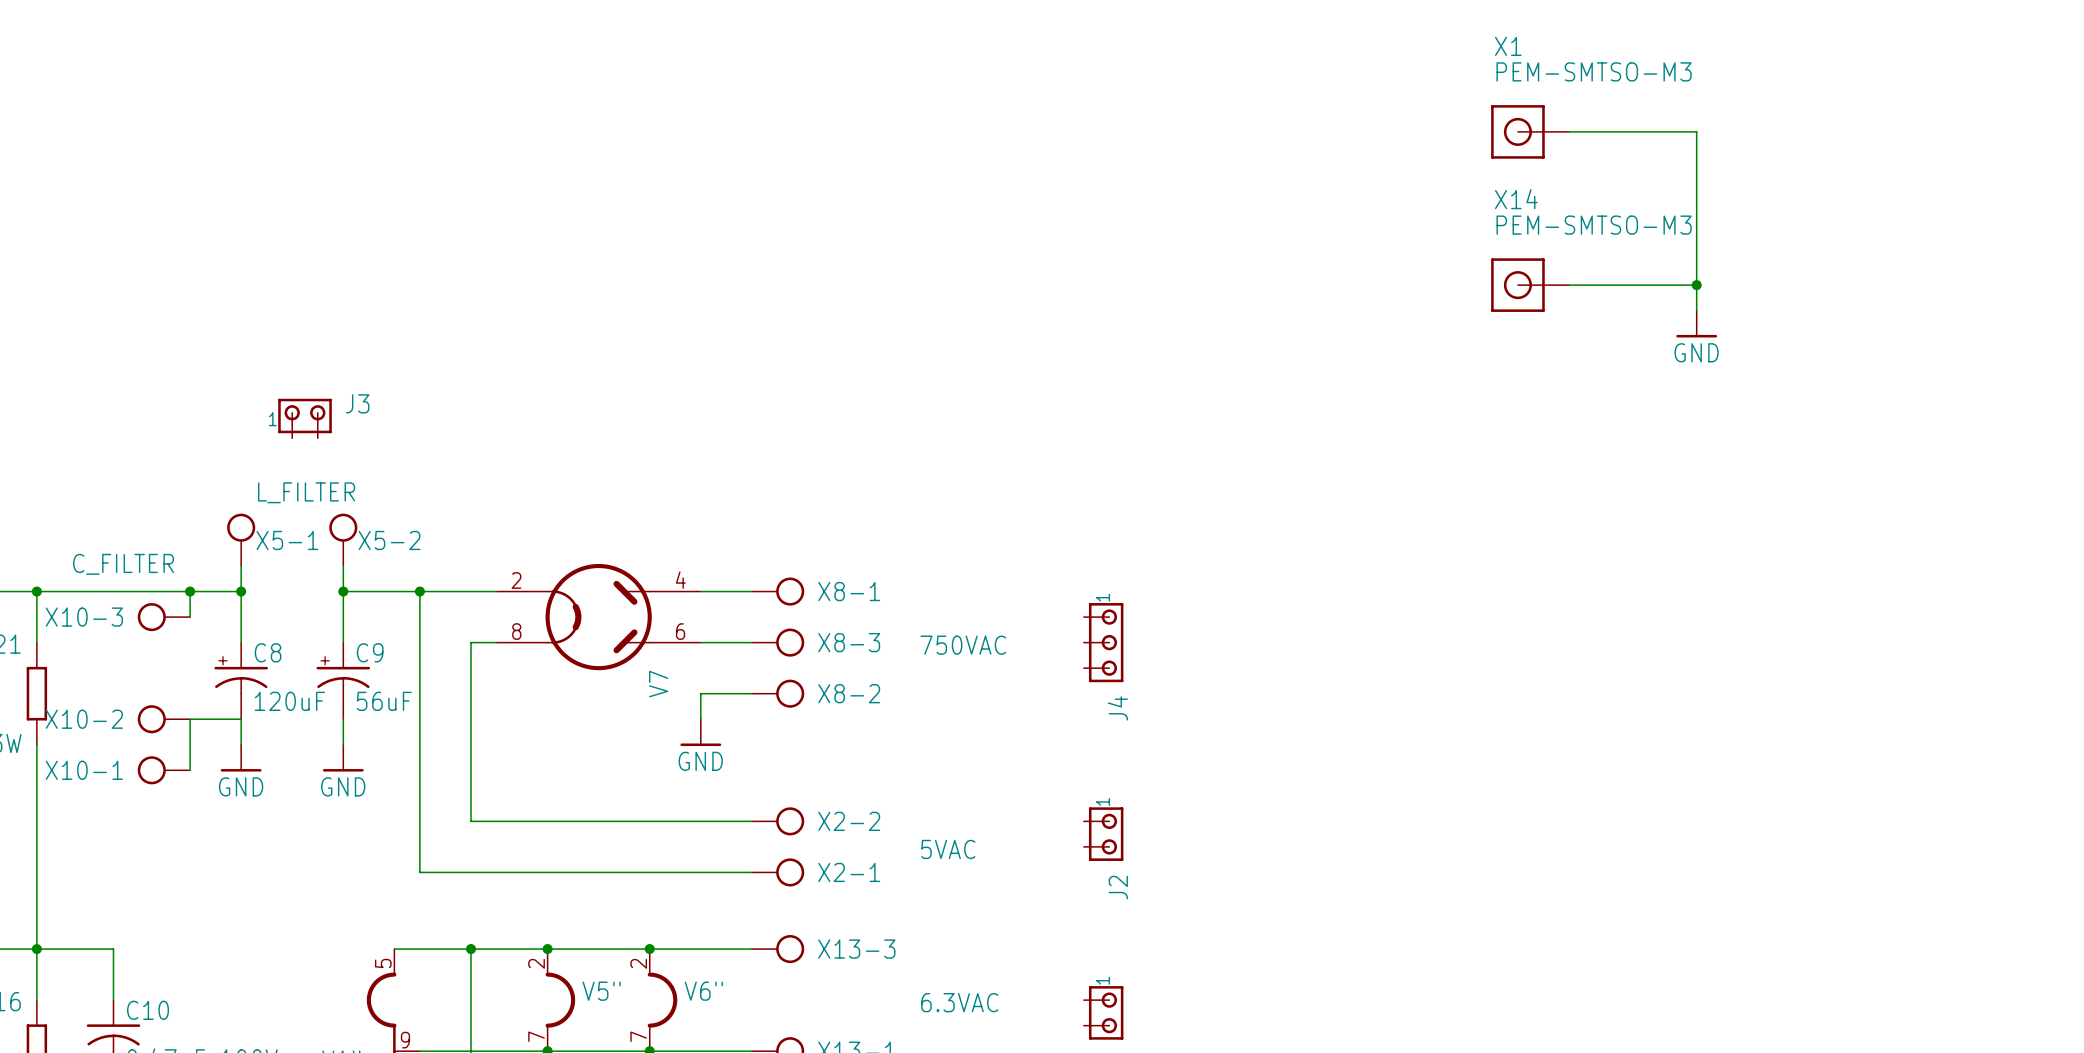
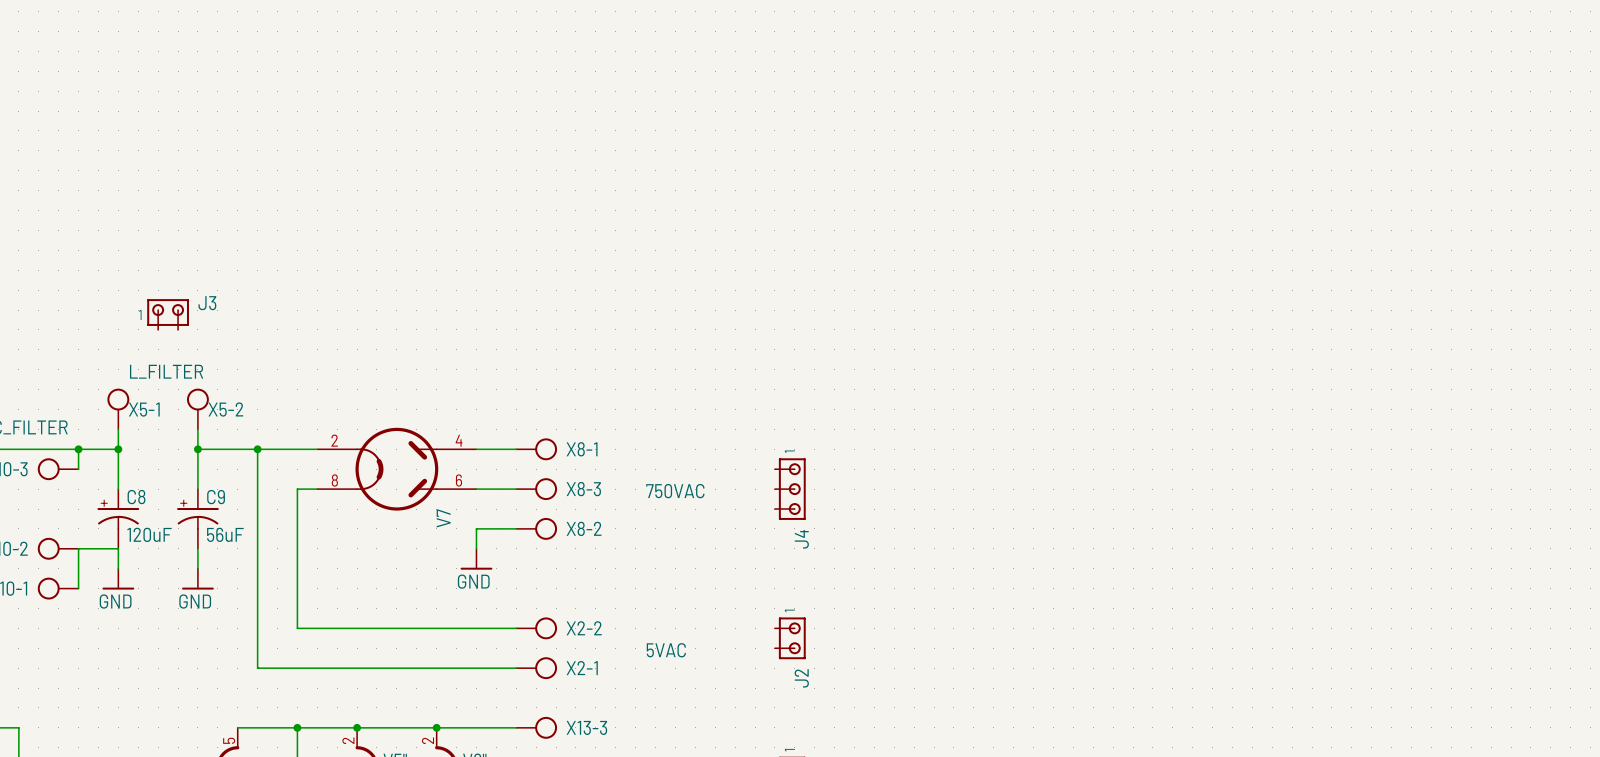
X1: PEM-SMTSO-M3 (1530, 131) -> none
wire: (1569, 131) (1696, 131) (1696, 310) -> none
X14: PEM-SMTSO-M3 (1530, 285) -> none
wire: (1569, 285) (1696, 285) -> none
junction: (1696, 285) -> none
power symbol: GND (1696, 324) -> none

